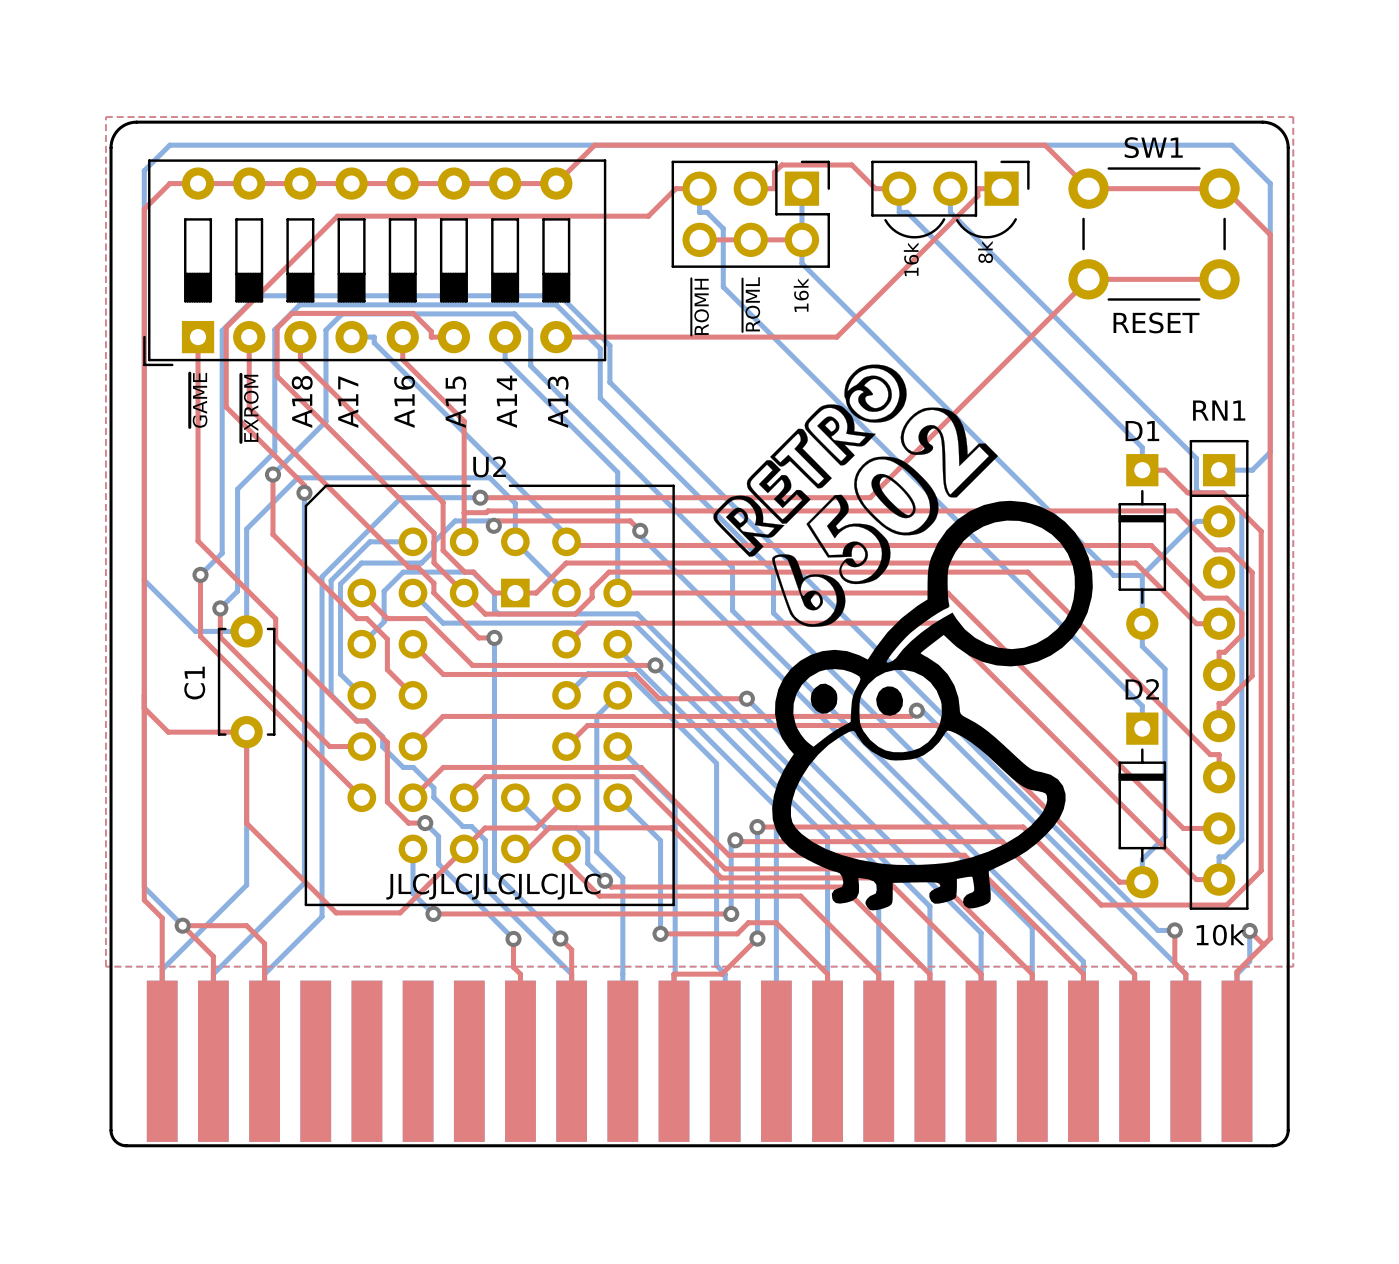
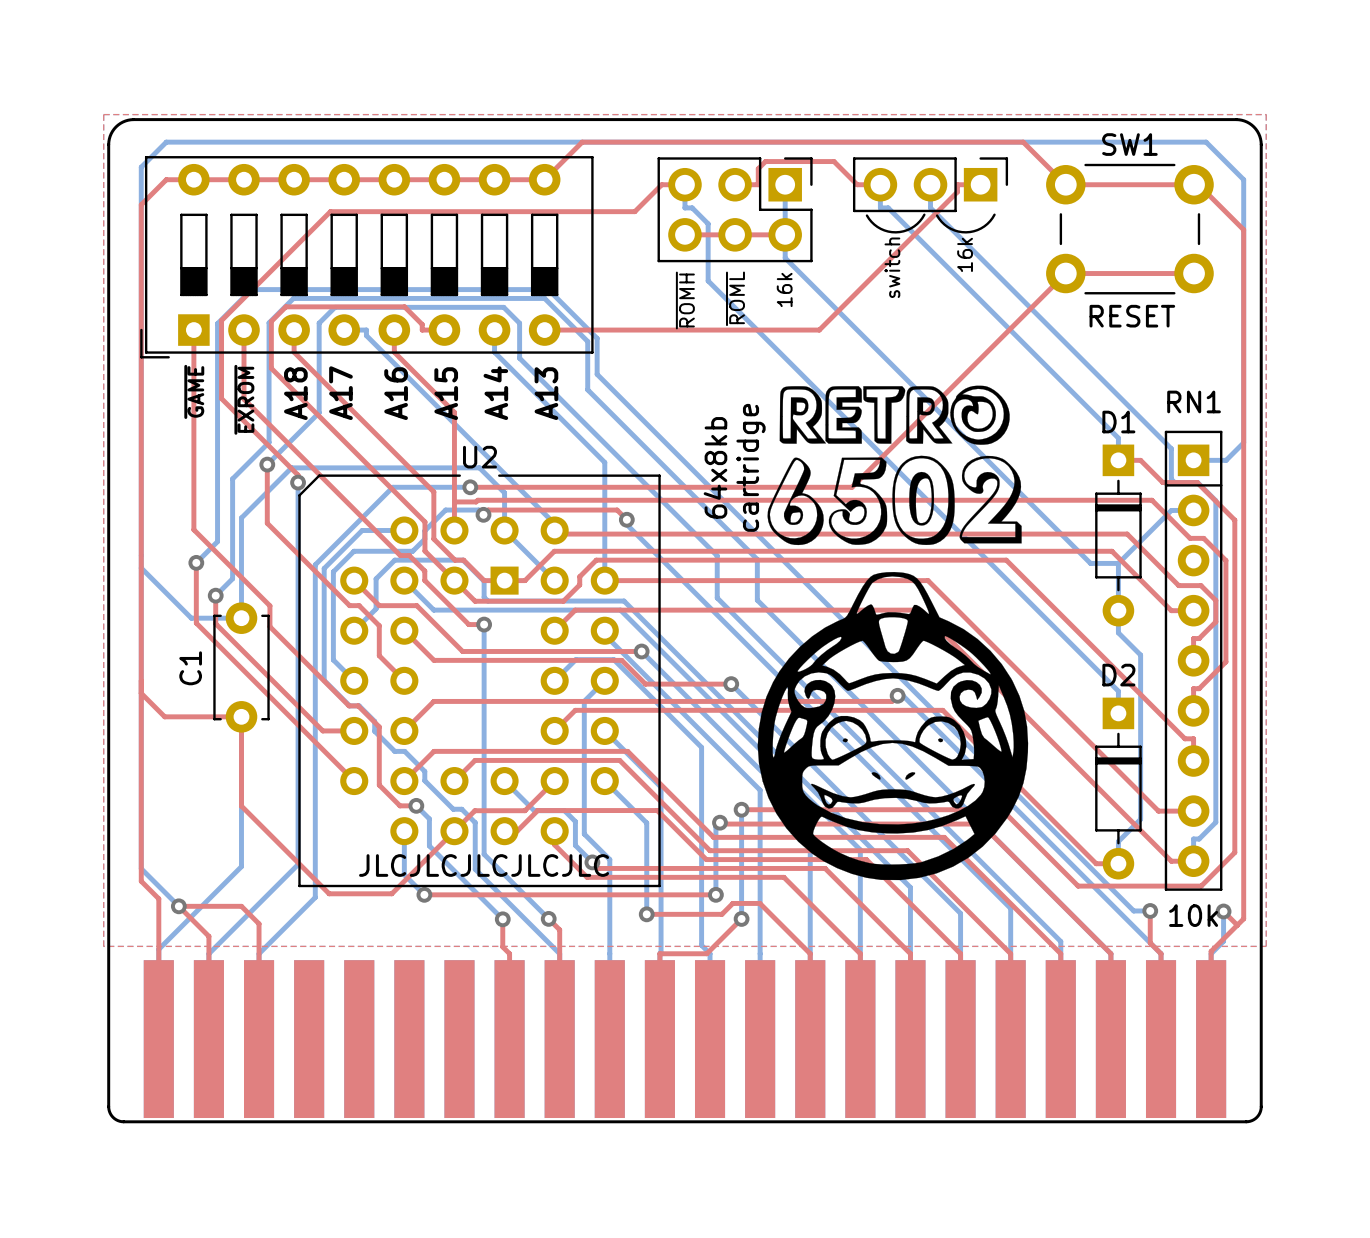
text: 8k (985, 252) -> 16k (965, 254)
text: 16k (911, 259) -> switch (892, 267)
drawing: [713, 364, 1093, 911] -> none
drawing: none -> [767, 385, 1022, 546]
text: none -> 64x8kb (715, 467)
text: none -> cartridge (751, 467)
drawing: none -> [757, 571, 1029, 881]

